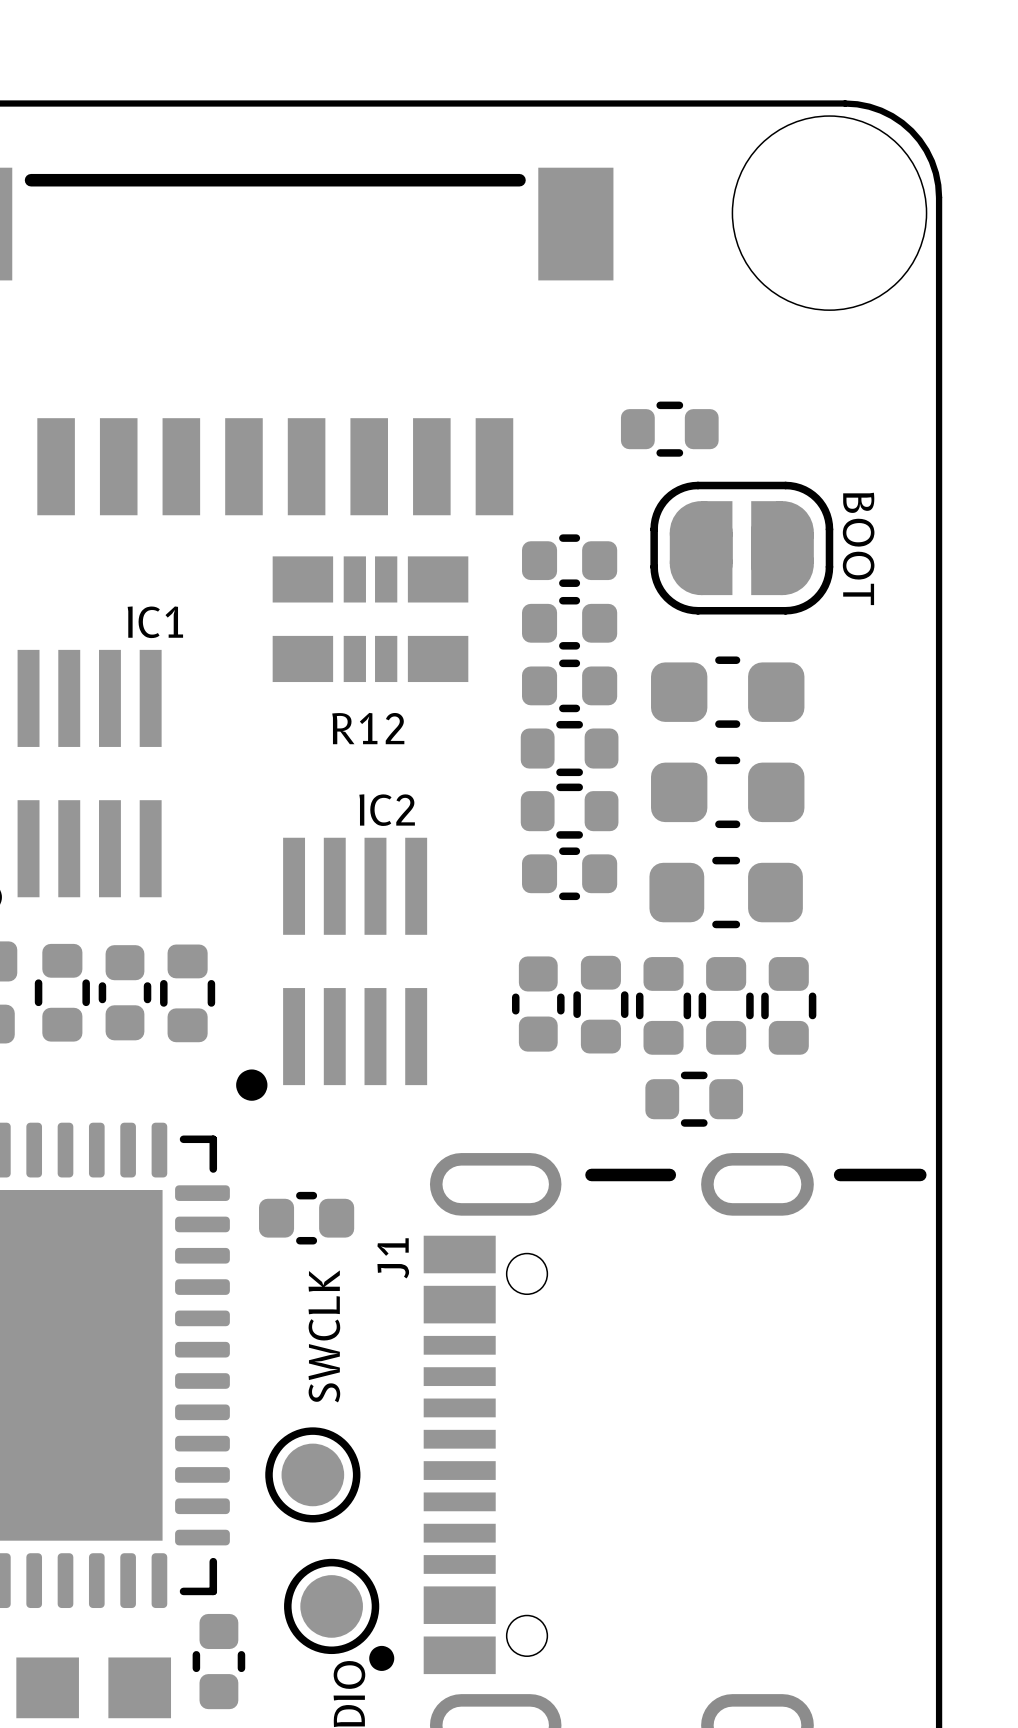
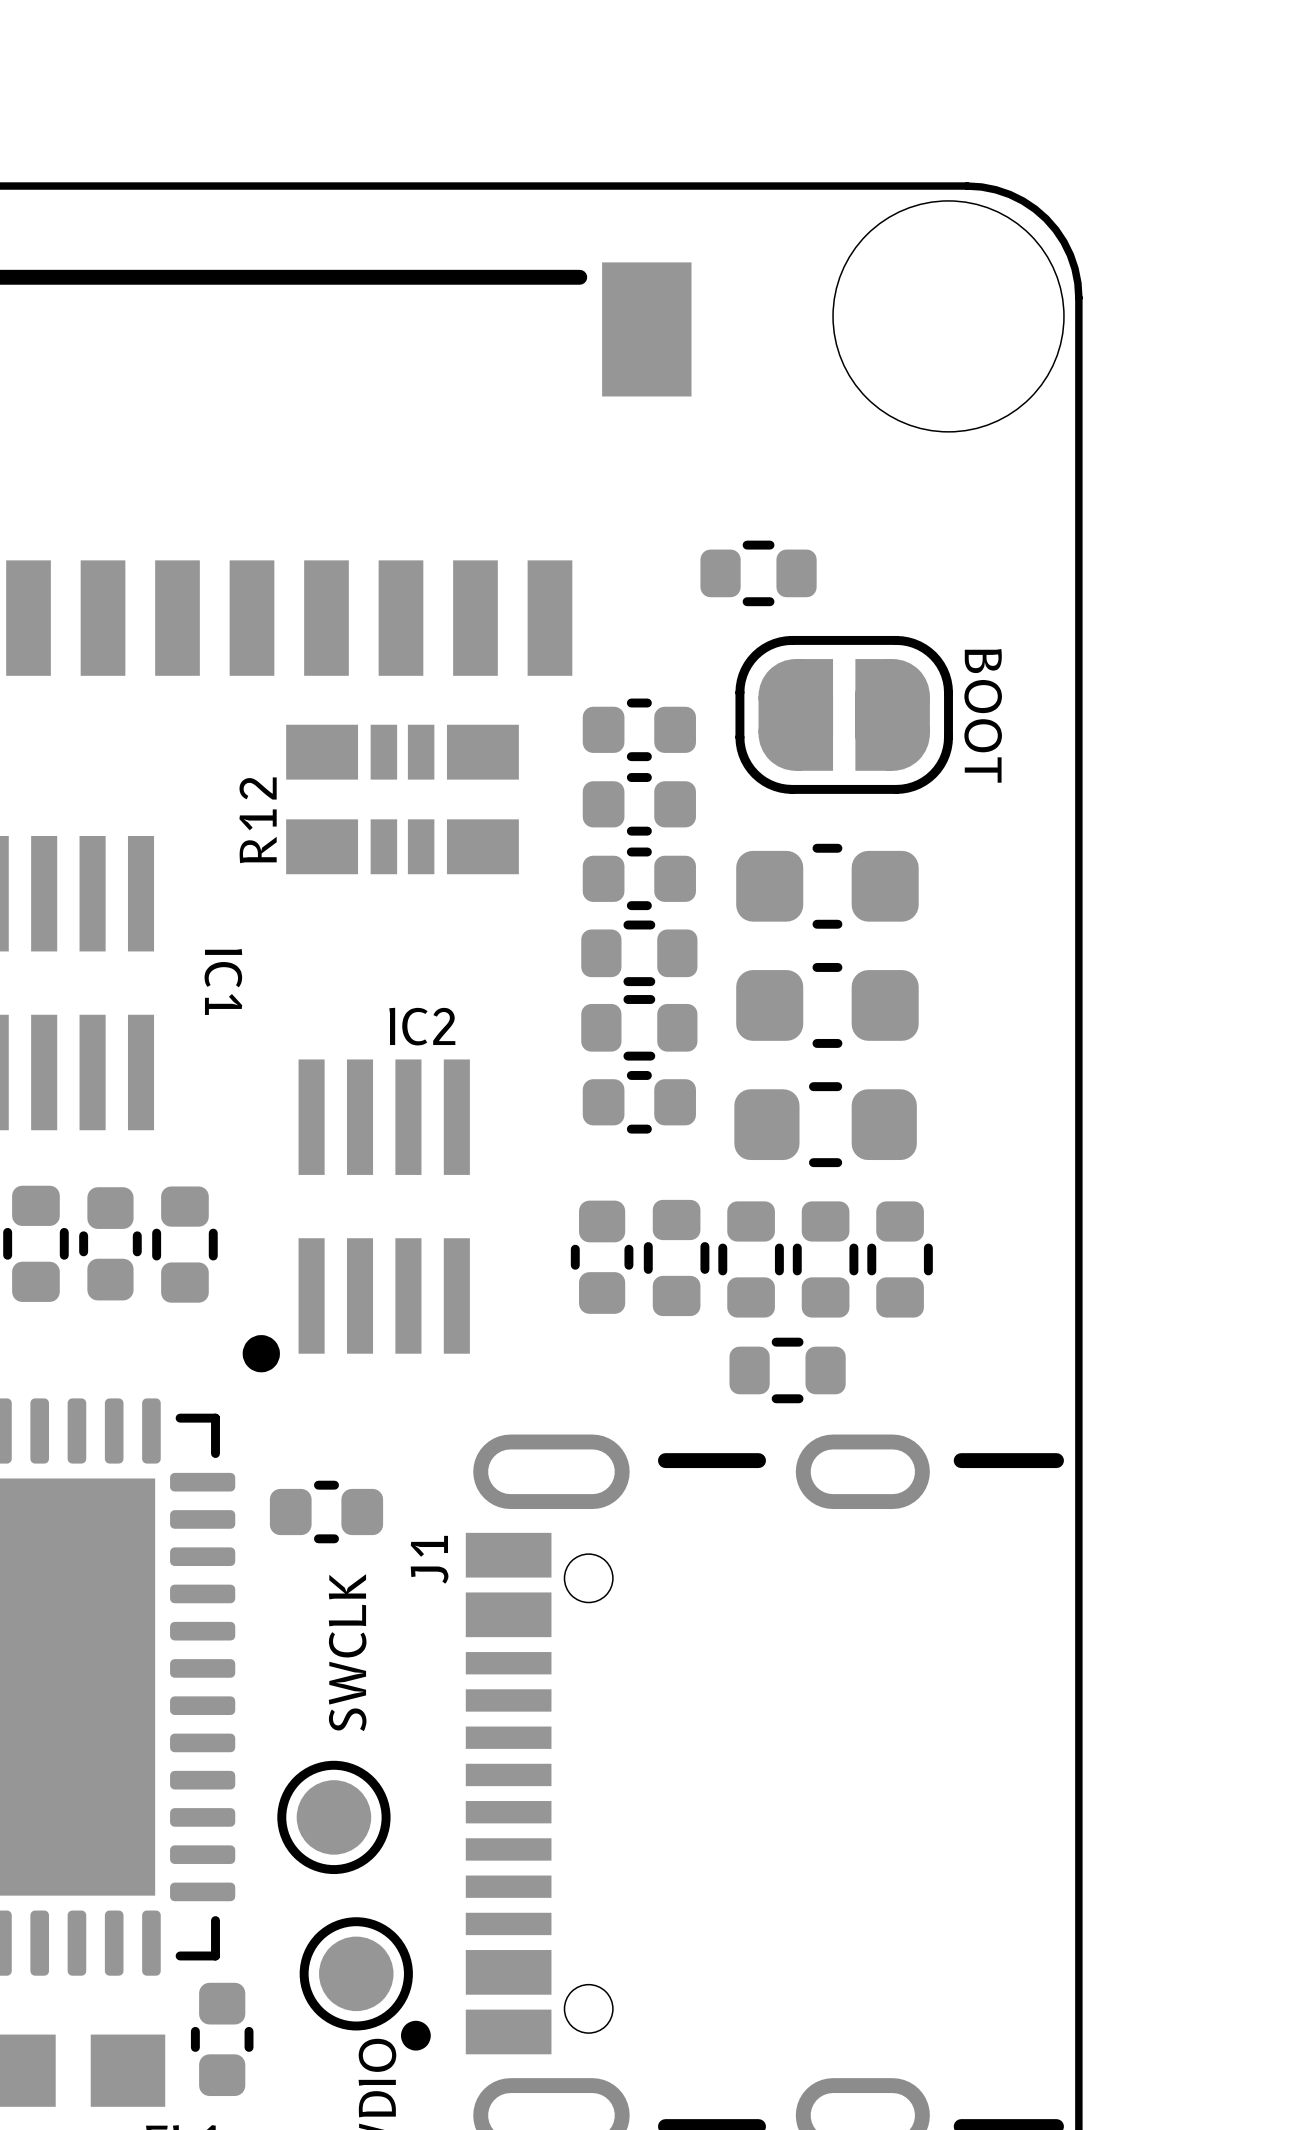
IC1 name rotation: 0° (155, 622) -> 90° clockwise (223, 982)
IC1 name position: IC1 (155, 622) -> IC1 (223, 982)
R12 name rotation: 0° (368, 728) -> 90° counterclockwise (258, 820)
R12 name position: R12 (368, 728) -> R12 (258, 820)

